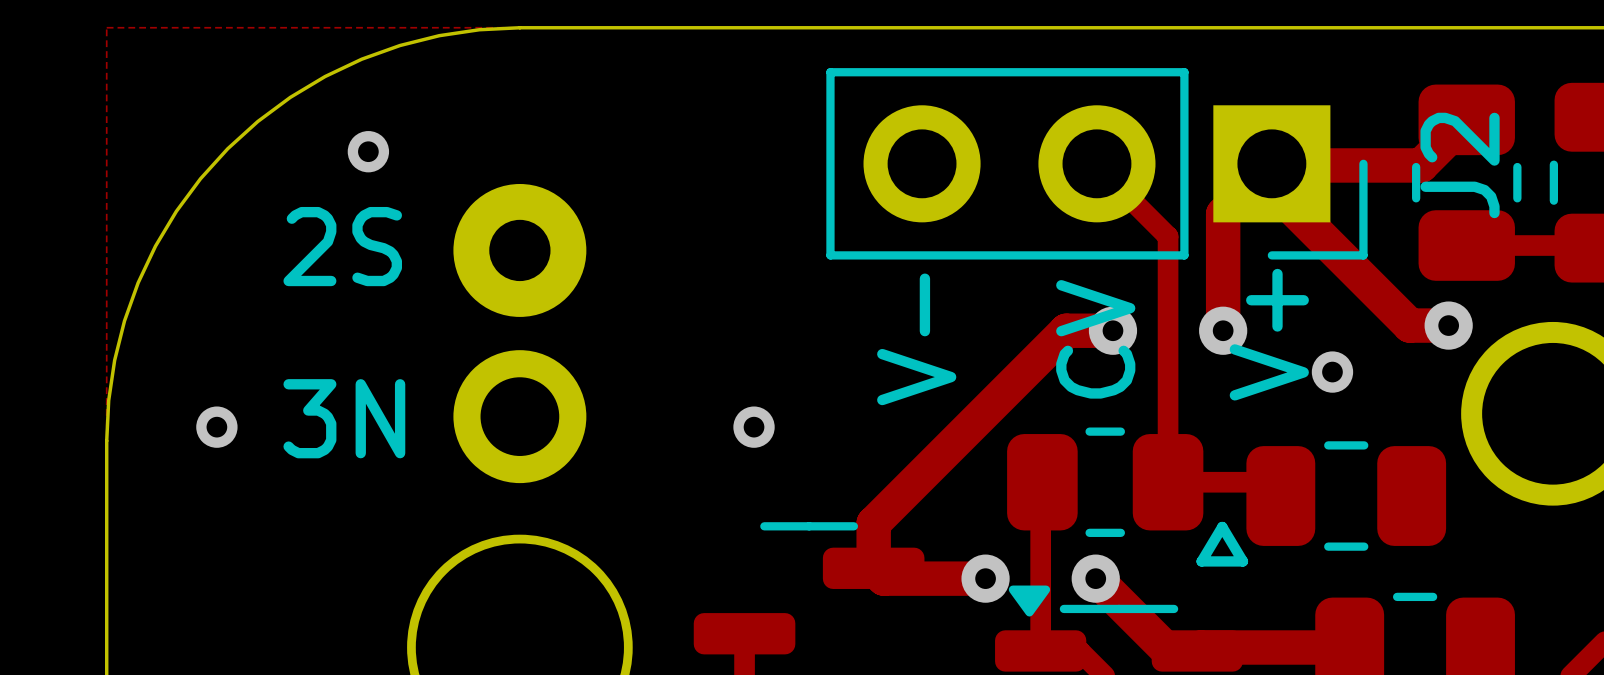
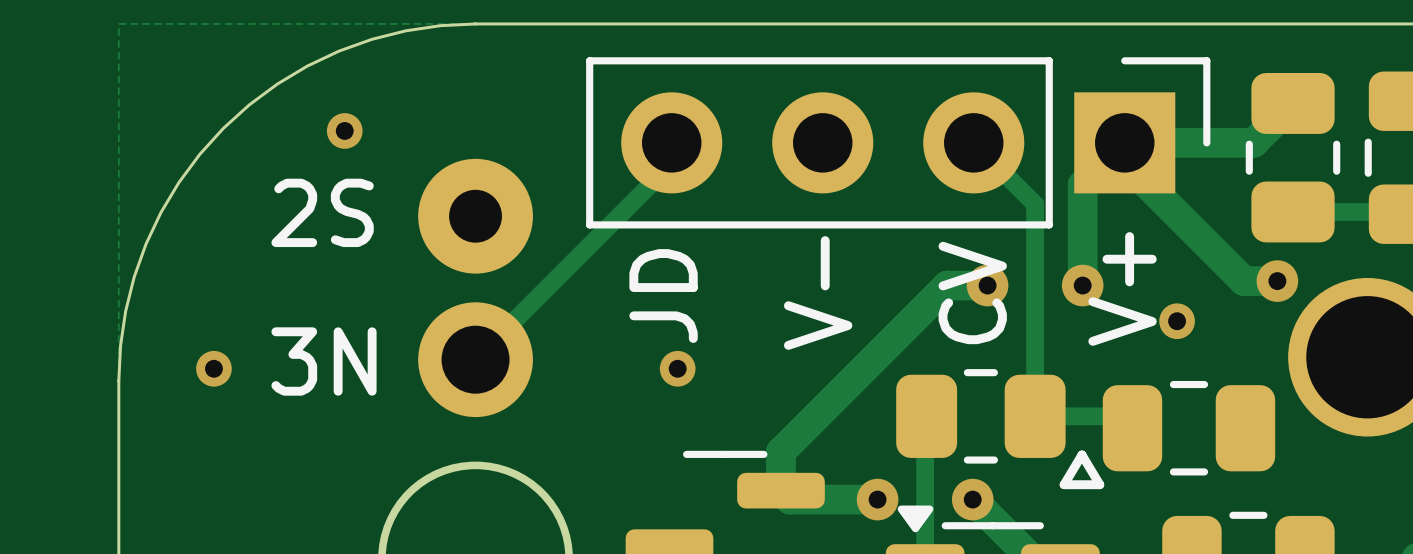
J2: (1096, 163) -> none
track: none -> (671, 142) (671, 163) (475, 359)
part: none -> (898, 142)
text: none -> JD (663, 296)

